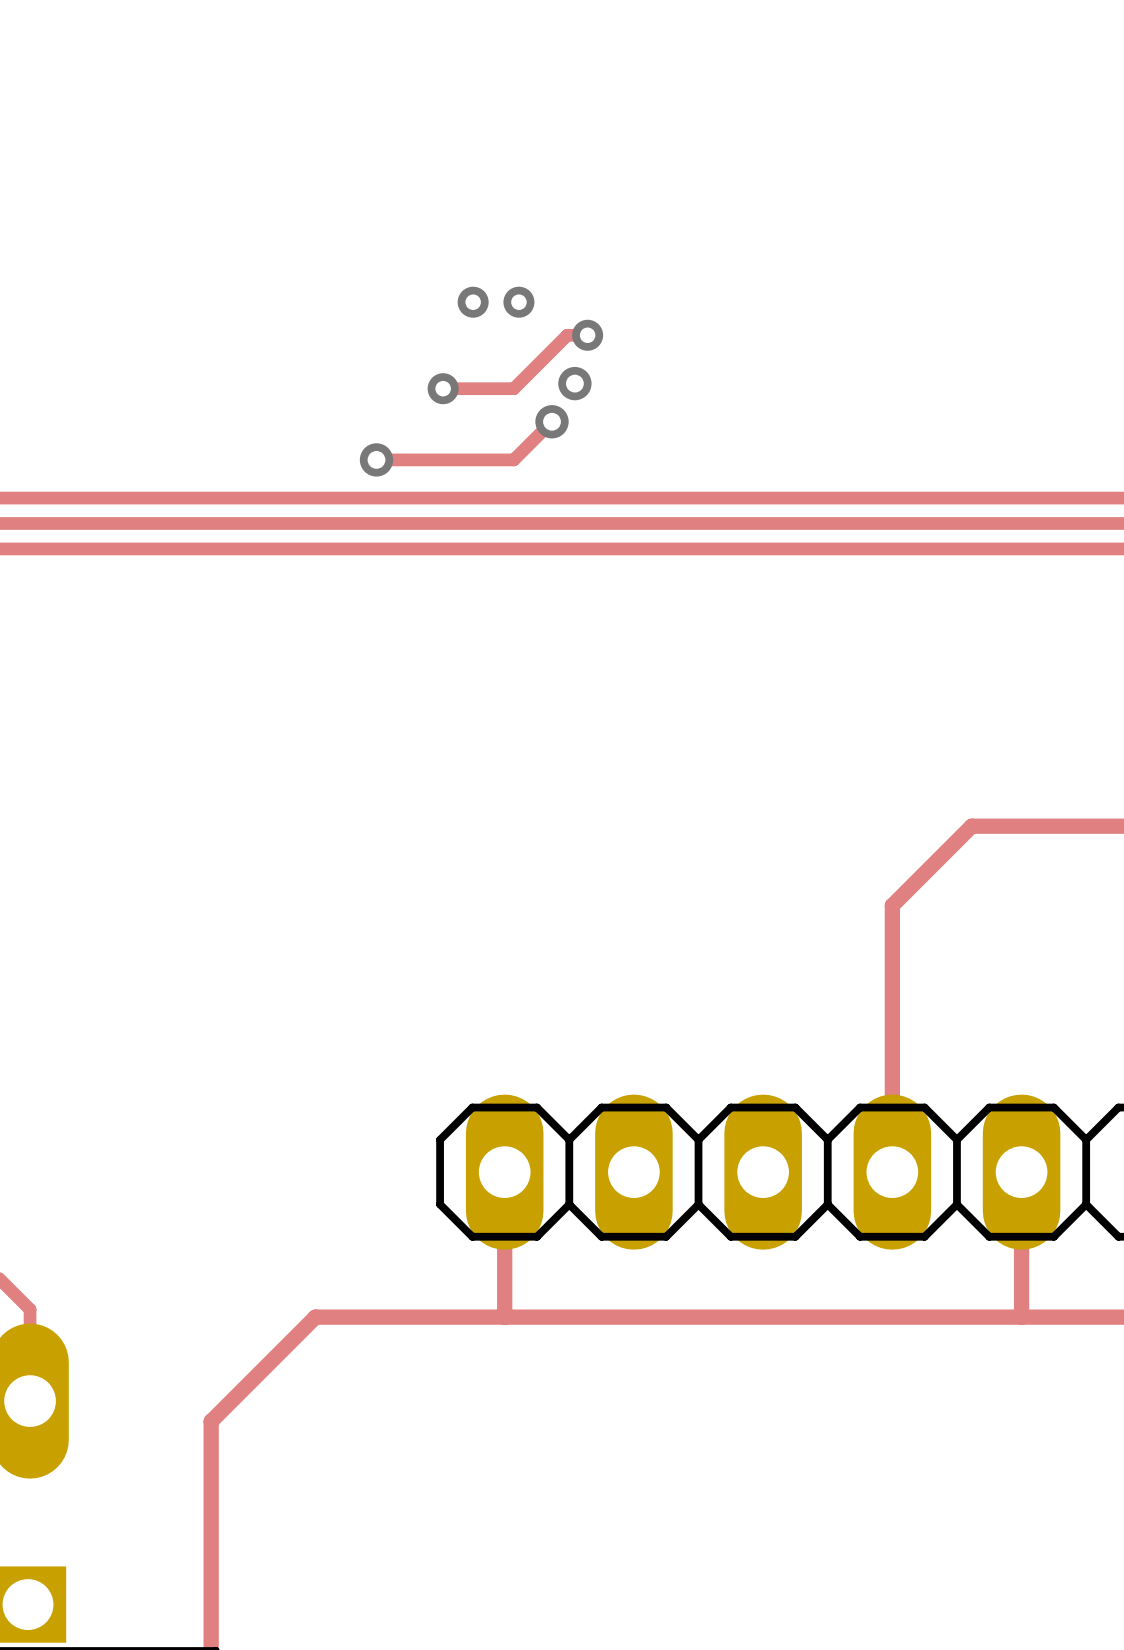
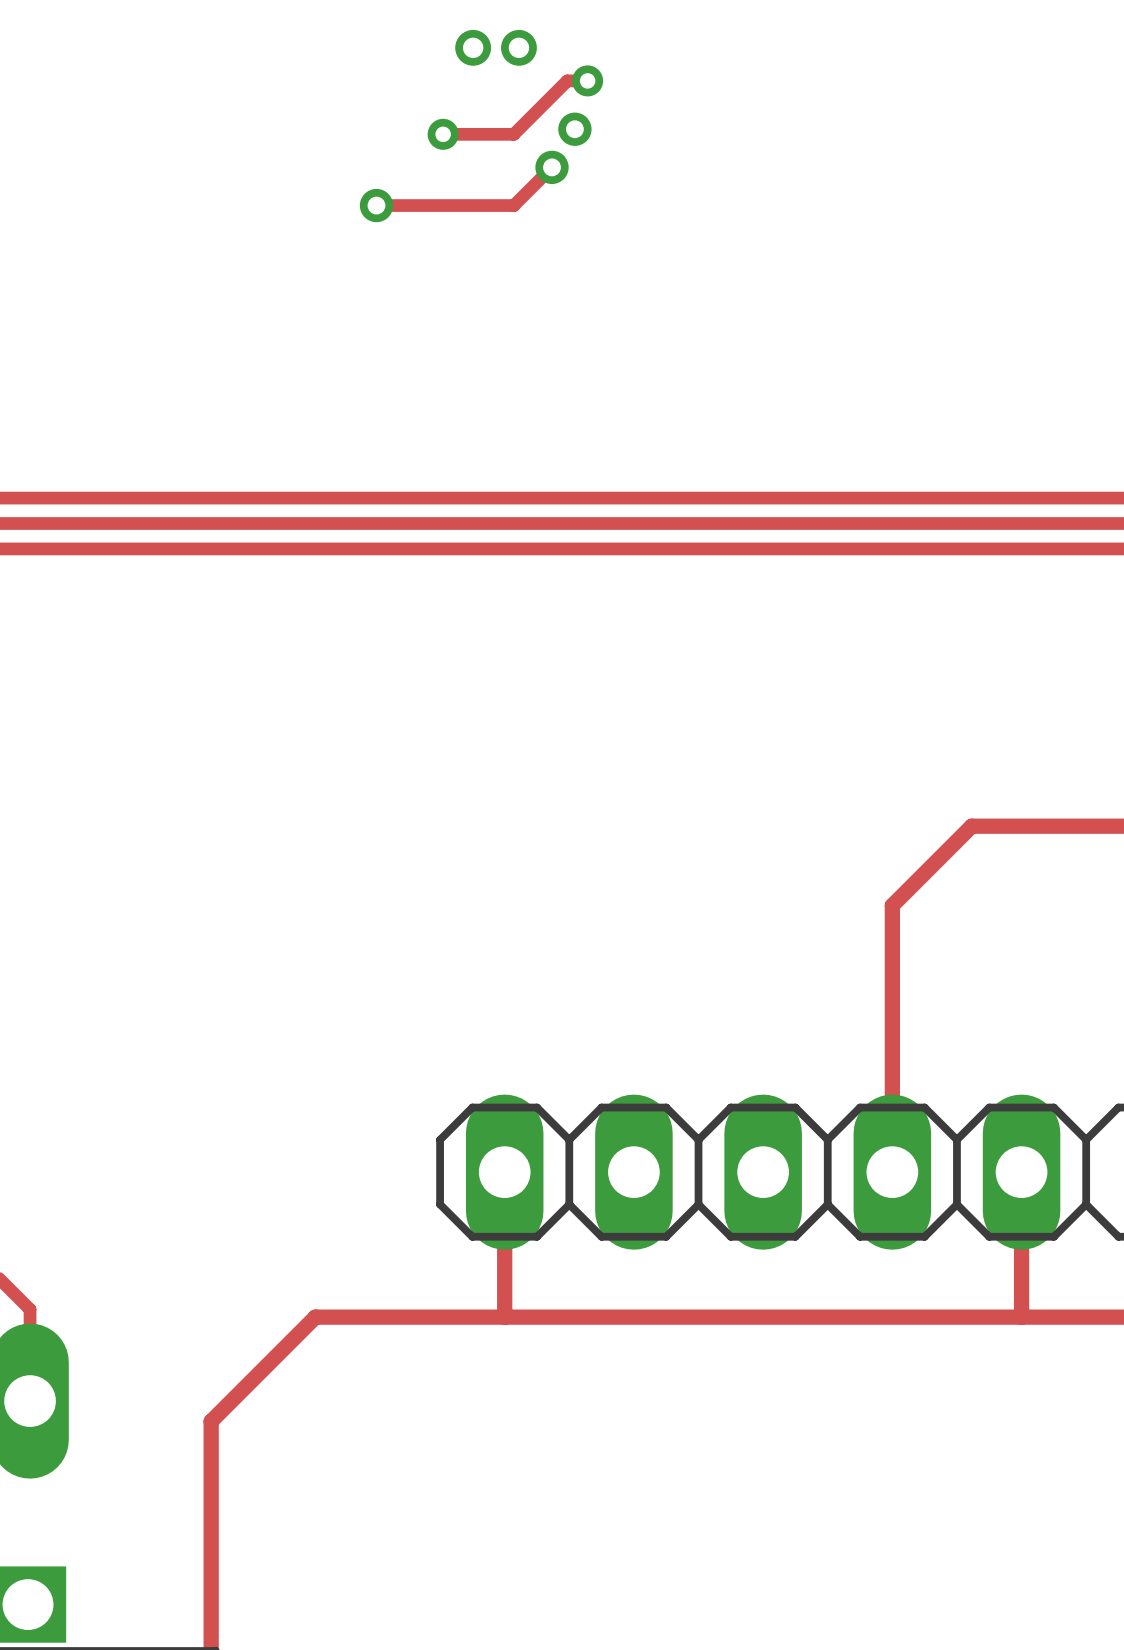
via: none -> (473, 47)
via: none -> (518, 47)
via: none -> (587, 80)
via: none -> (574, 129)
via: none -> (443, 134)
via: none -> (552, 167)
via: none -> (376, 205)
via: (473, 302) -> none
via: (518, 302) -> none
track: (587, 335) (567, 335) (513, 388) (443, 388) -> (587, 80) (567, 80) (513, 134) (443, 134)
via: (587, 335) -> none
via: (574, 383) -> none
via: (443, 388) -> none
track: (552, 421) (513, 459) (376, 459) -> (552, 167) (513, 205) (376, 205)
via: (552, 421) -> none
via: (376, 459) -> none

